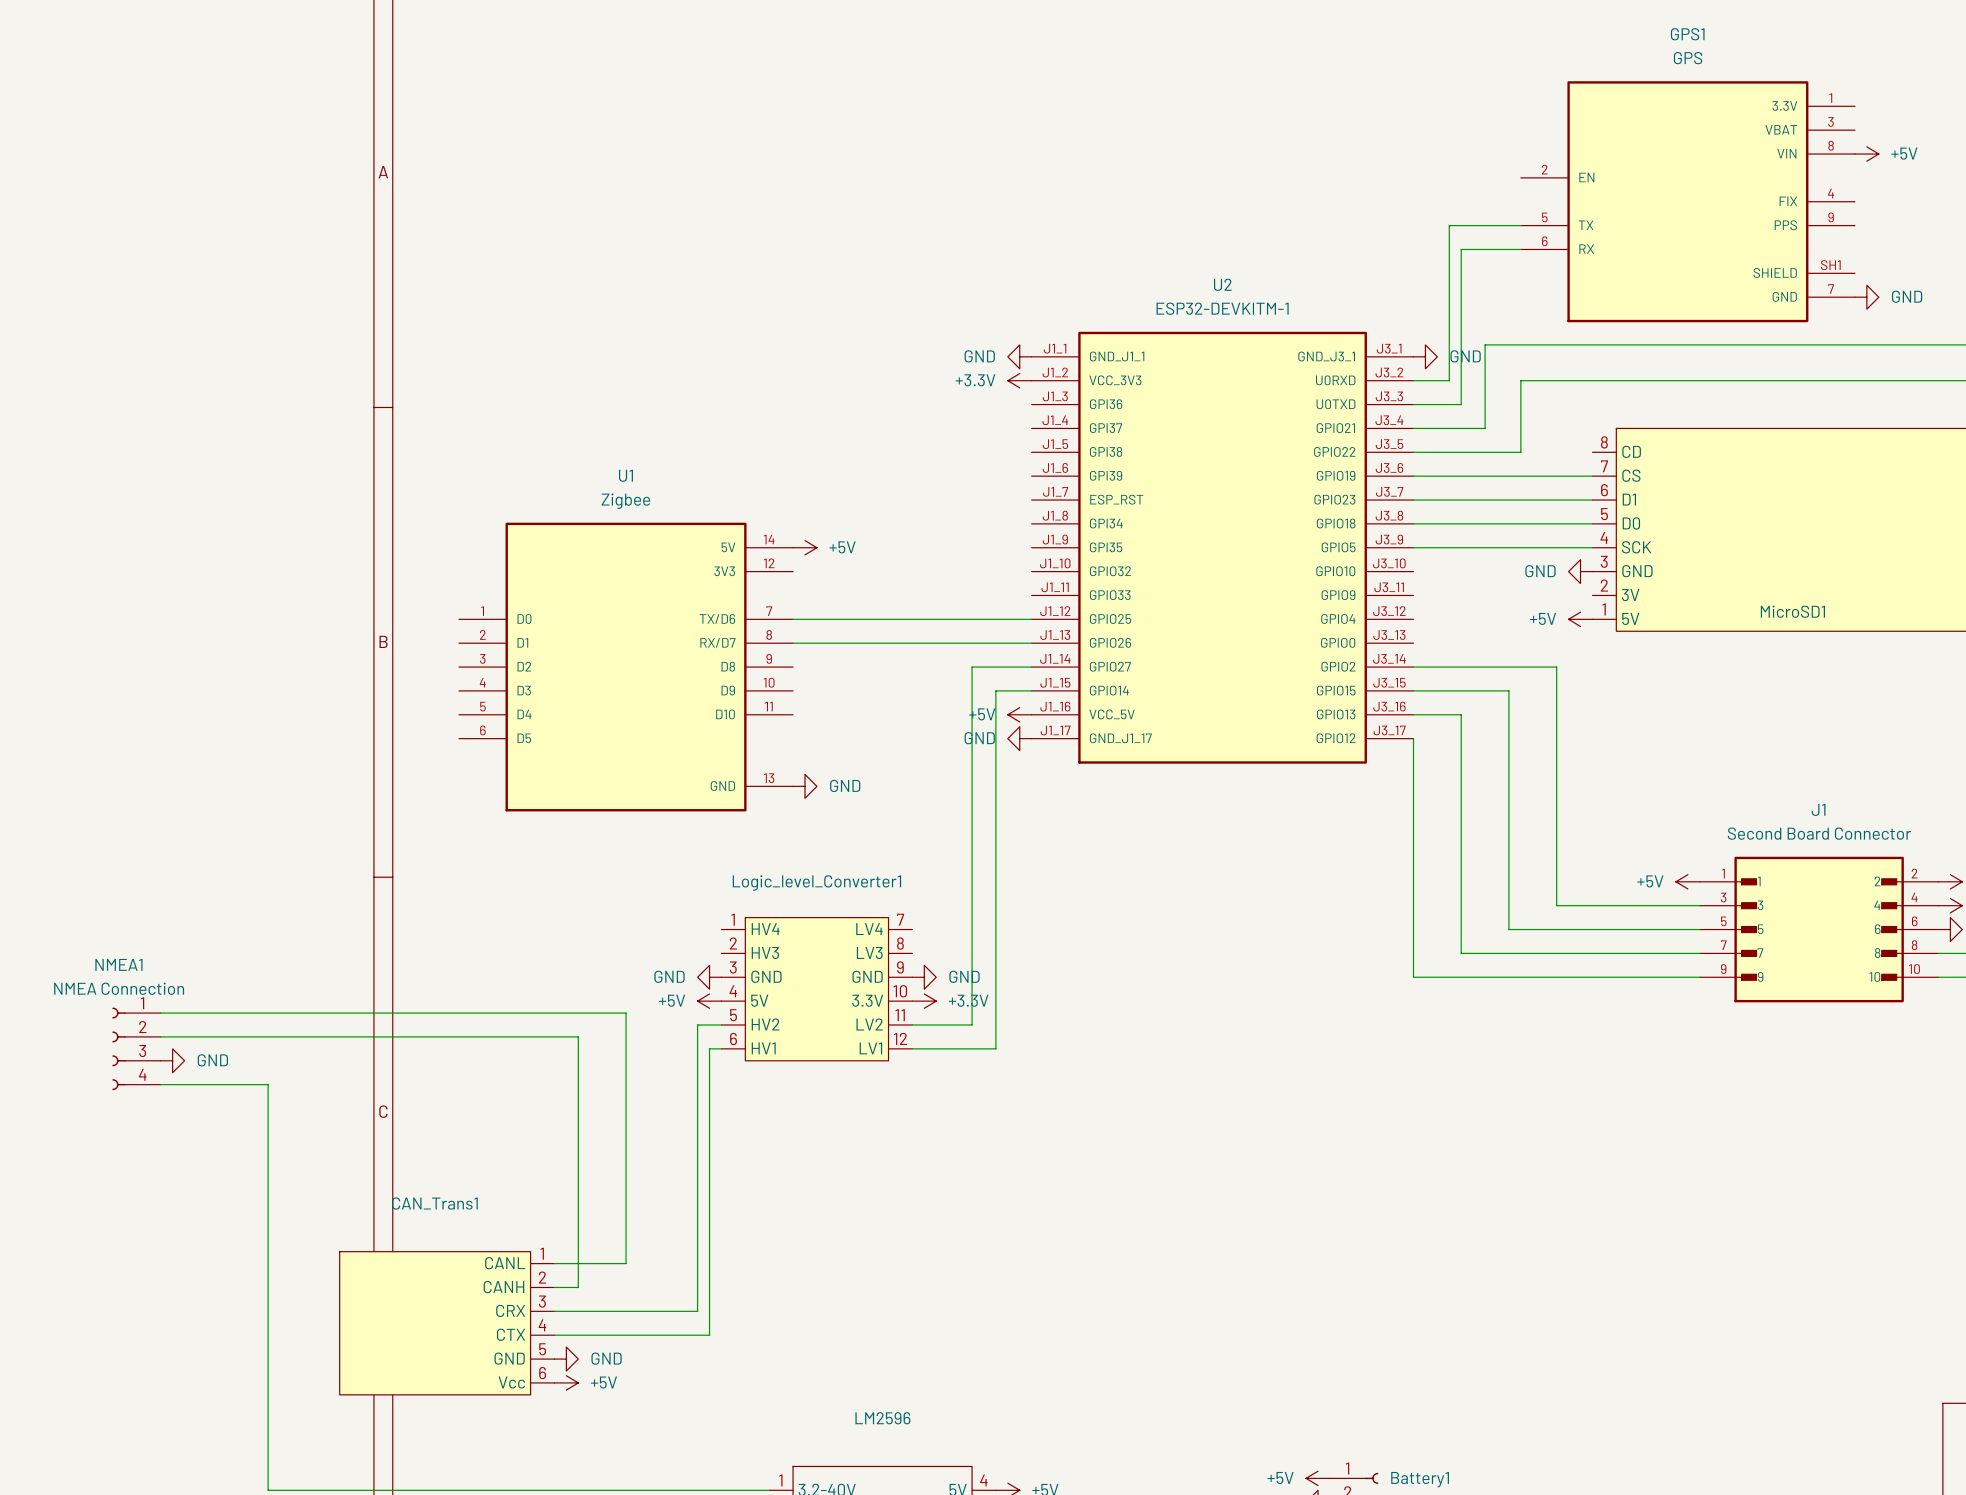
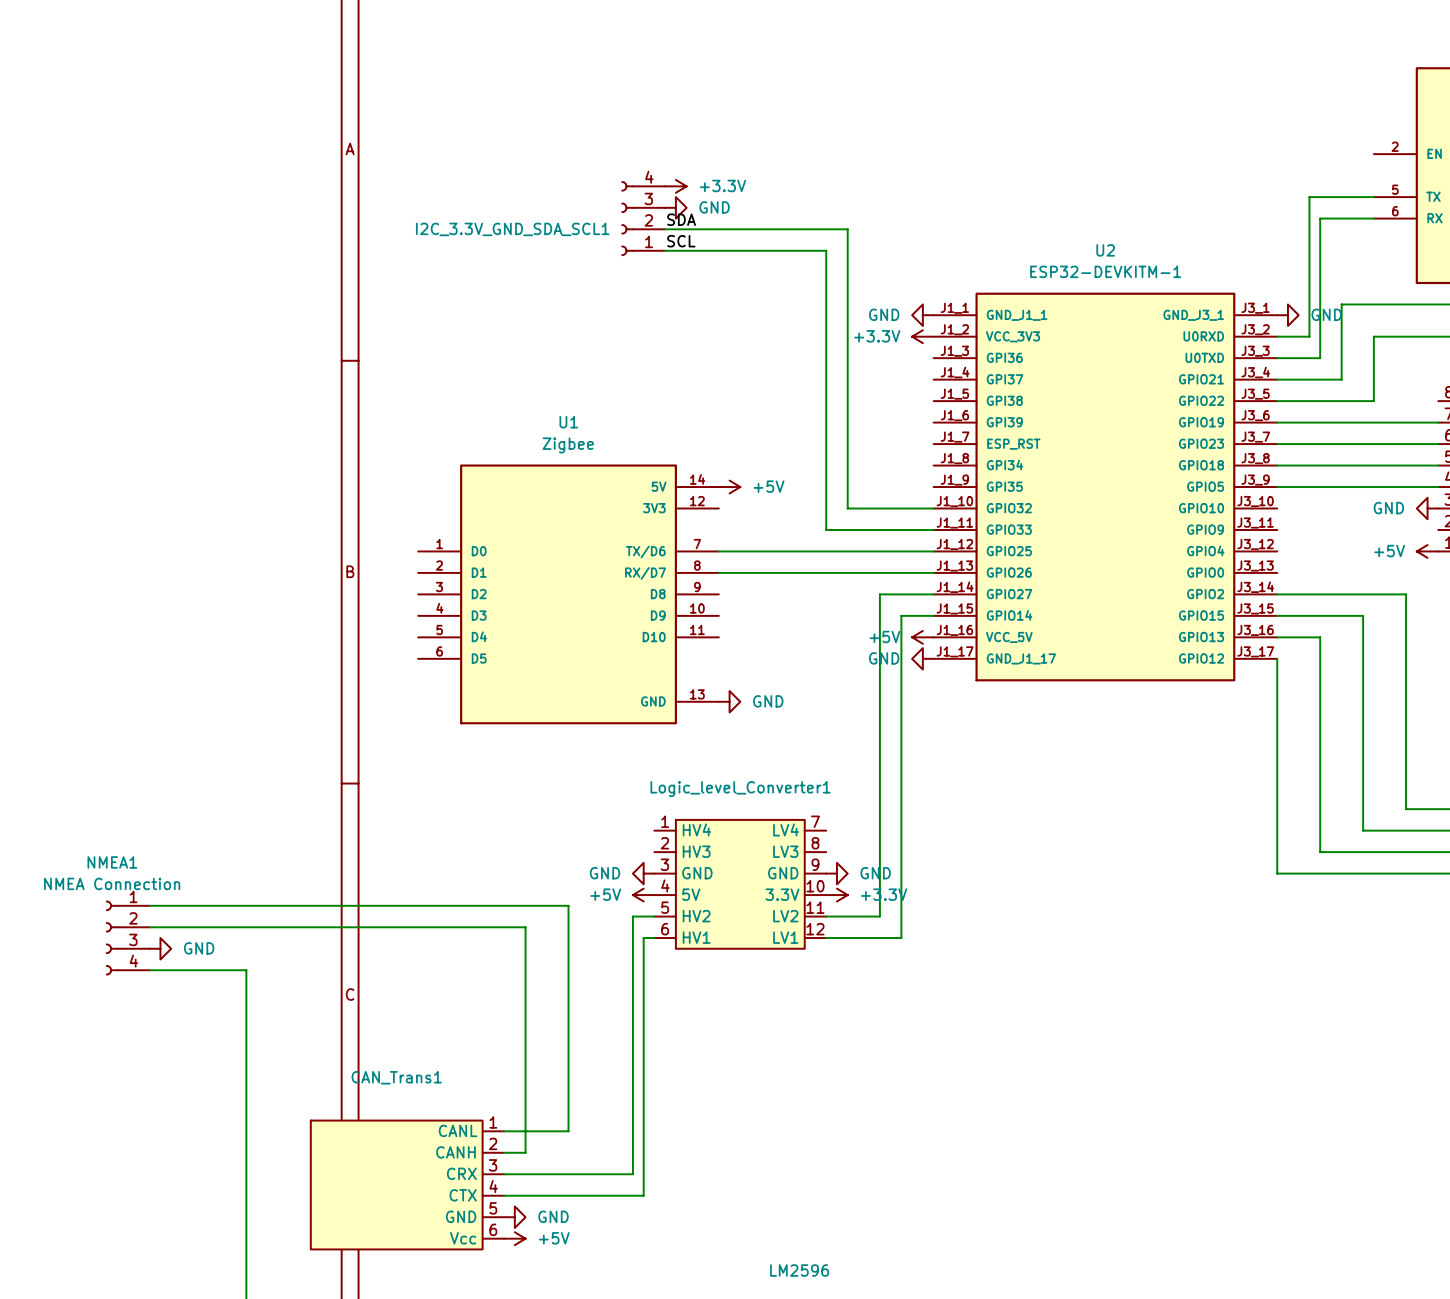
power symbol: none -> +3.3V (675, 186)
power symbol: none -> GND (675, 207)
I2C_3.3V_GND_SDA_SCL1: none -> (643, 218)
label: none -> SDA (681, 219)
wire: none -> (665, 229) (847, 229) (847, 508) (933, 508)
label: none -> SCL (681, 241)
wire: none -> (665, 250) (826, 250) (826, 529) (933, 529)

